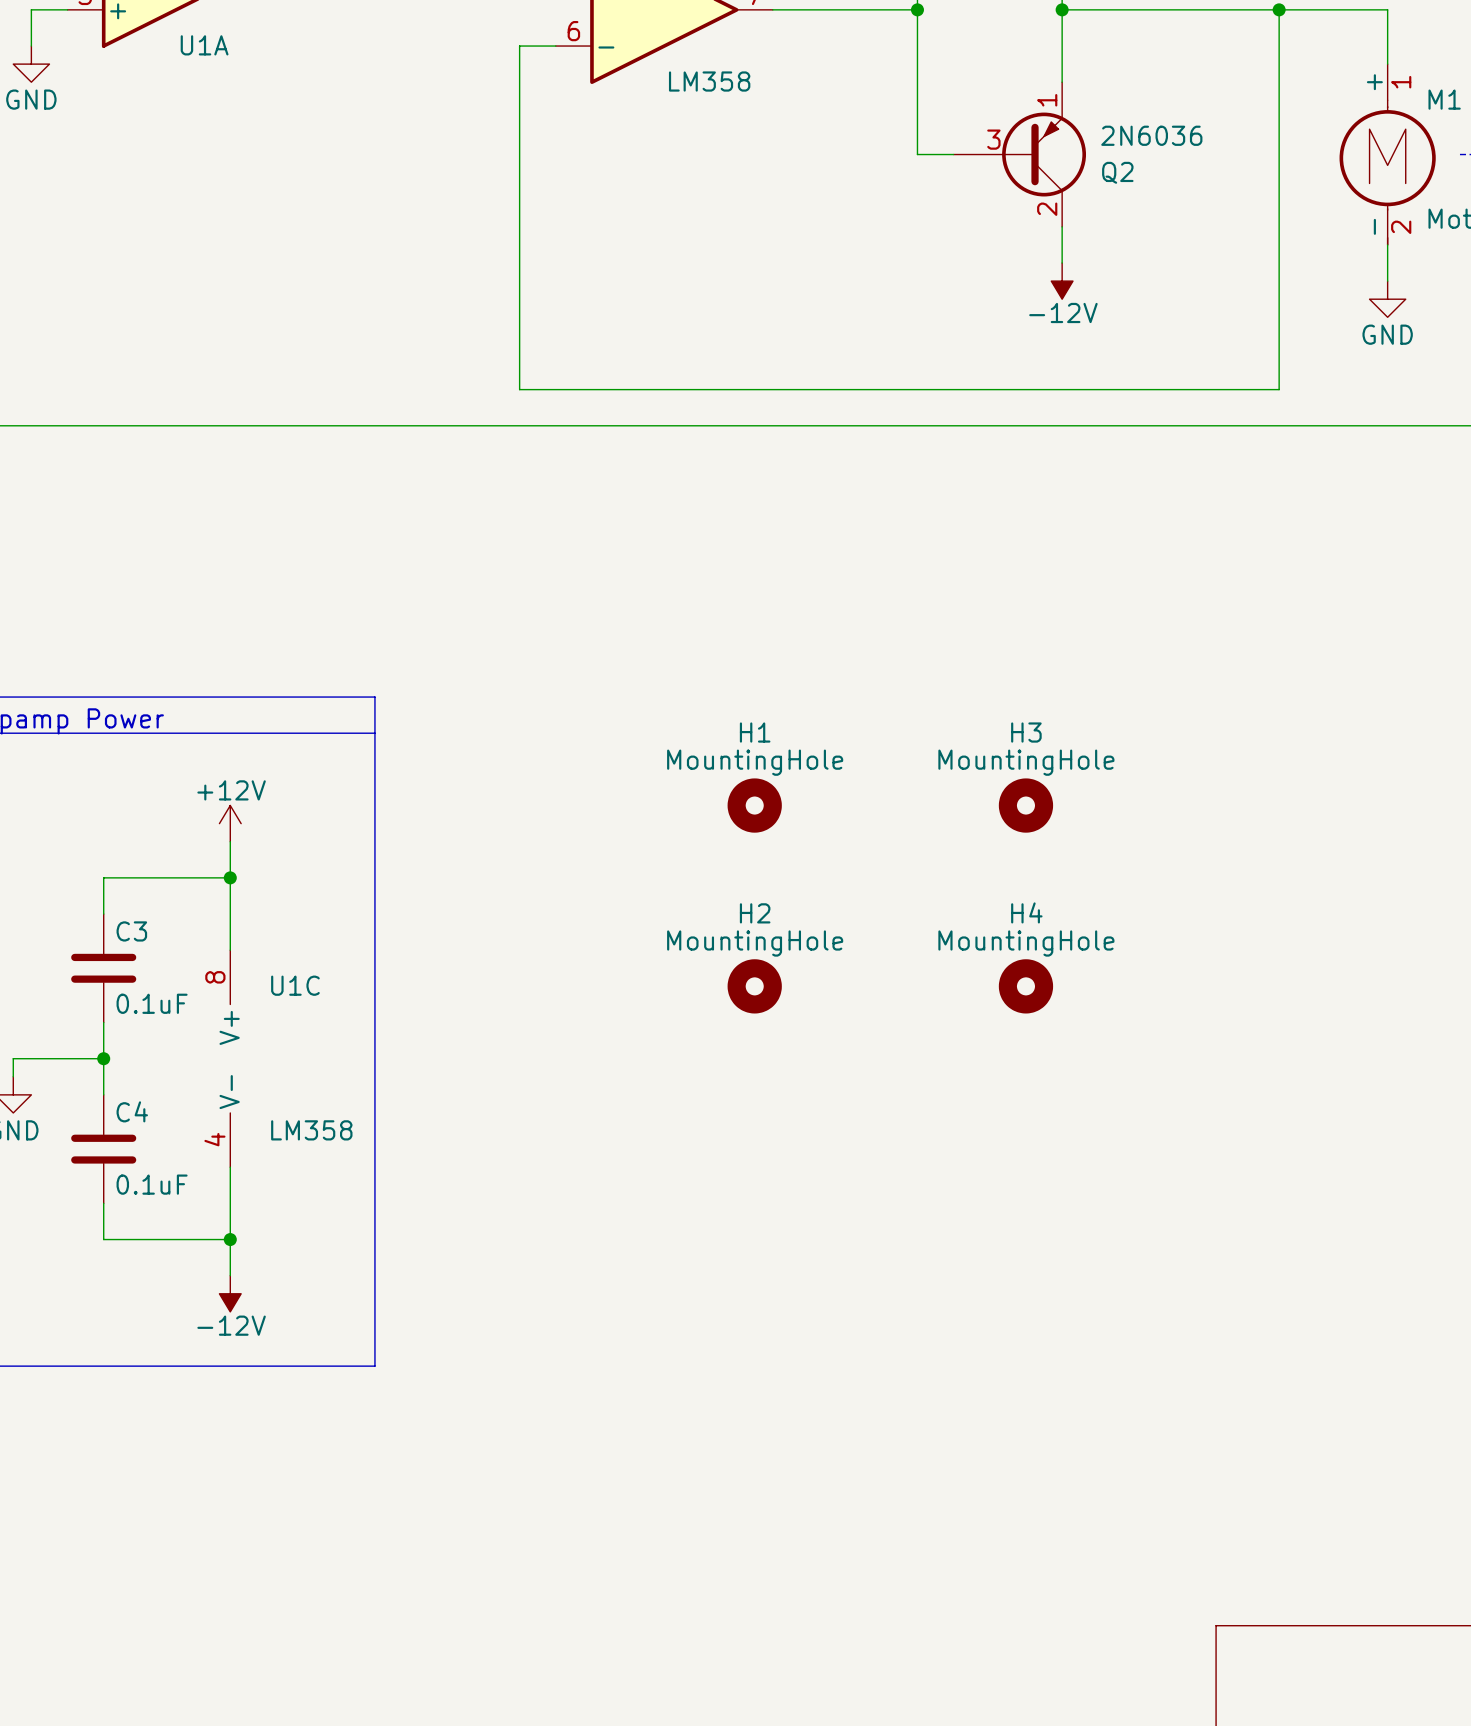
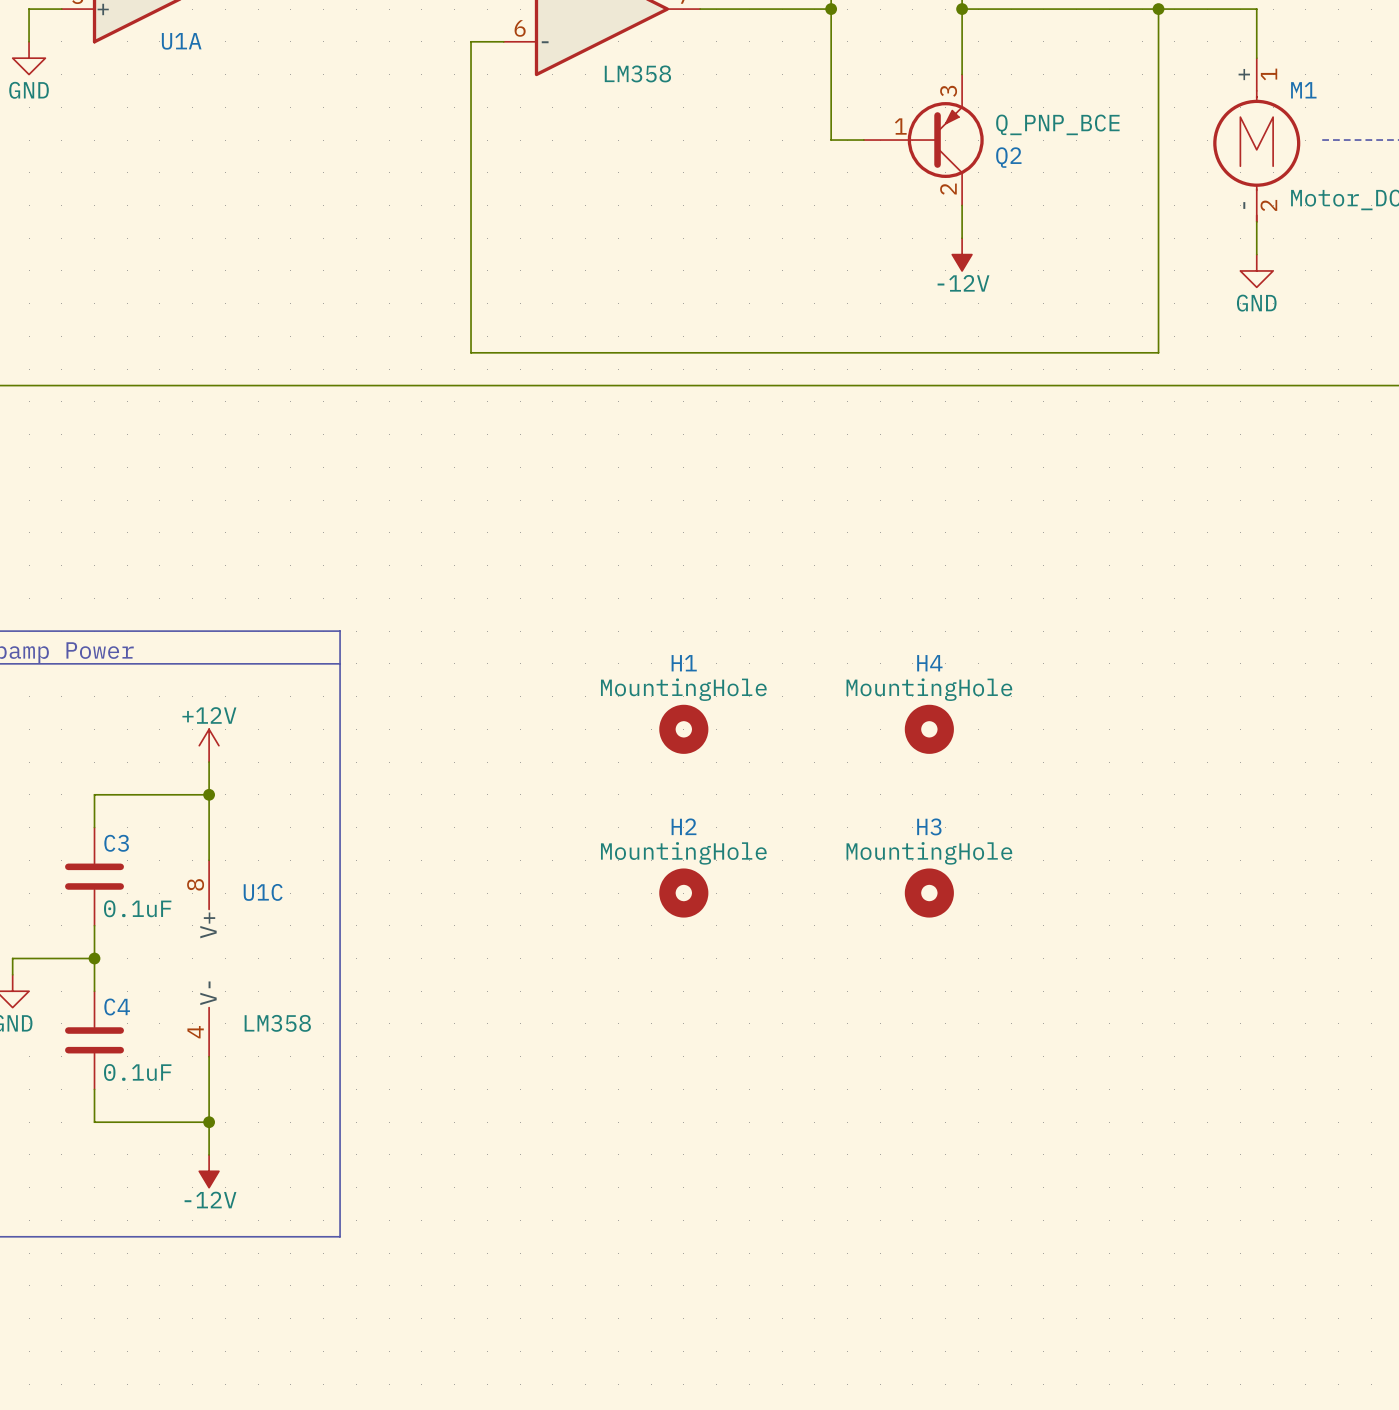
Q2 pin number: 1 (1047, 100) -> 3 (948, 91)
Q2 value: 2N6036 (1151, 135) -> Q_PNP_BCE (1057, 124)
Q2 pin number: 3 (993, 139) -> 1 (900, 126)
H3 name: H3 (1026, 732) -> H4 (929, 663)
H4 name: H4 (1026, 912) -> H3 (929, 826)

